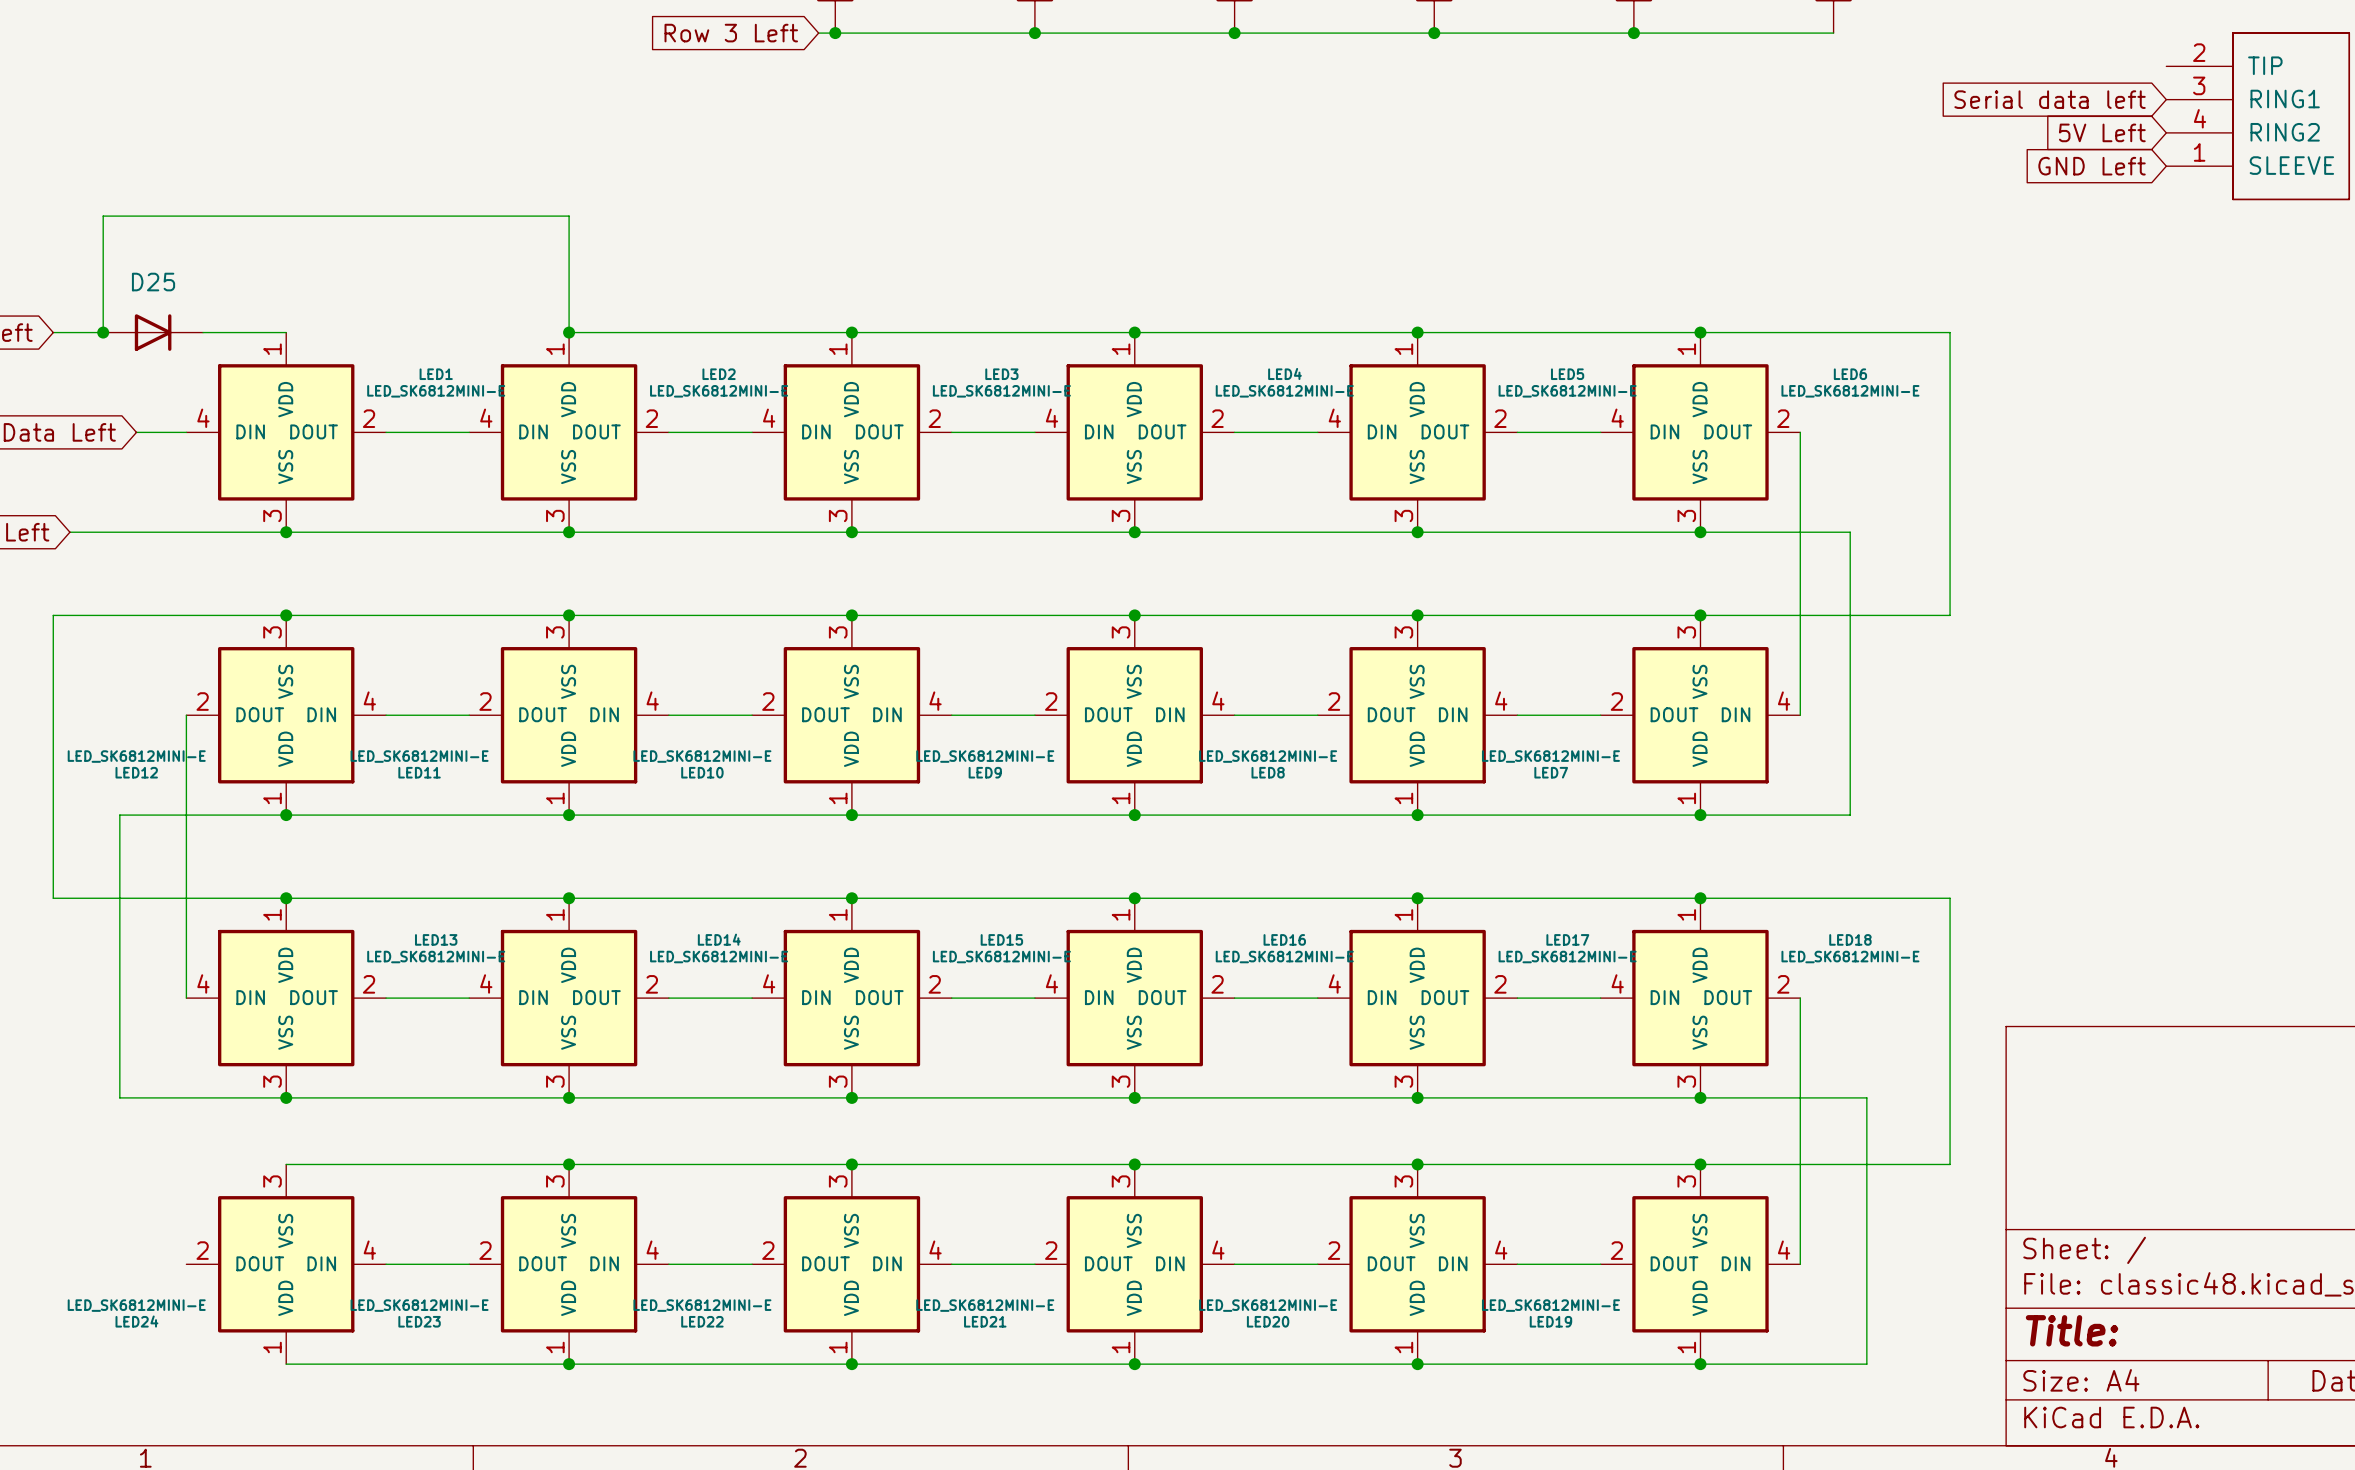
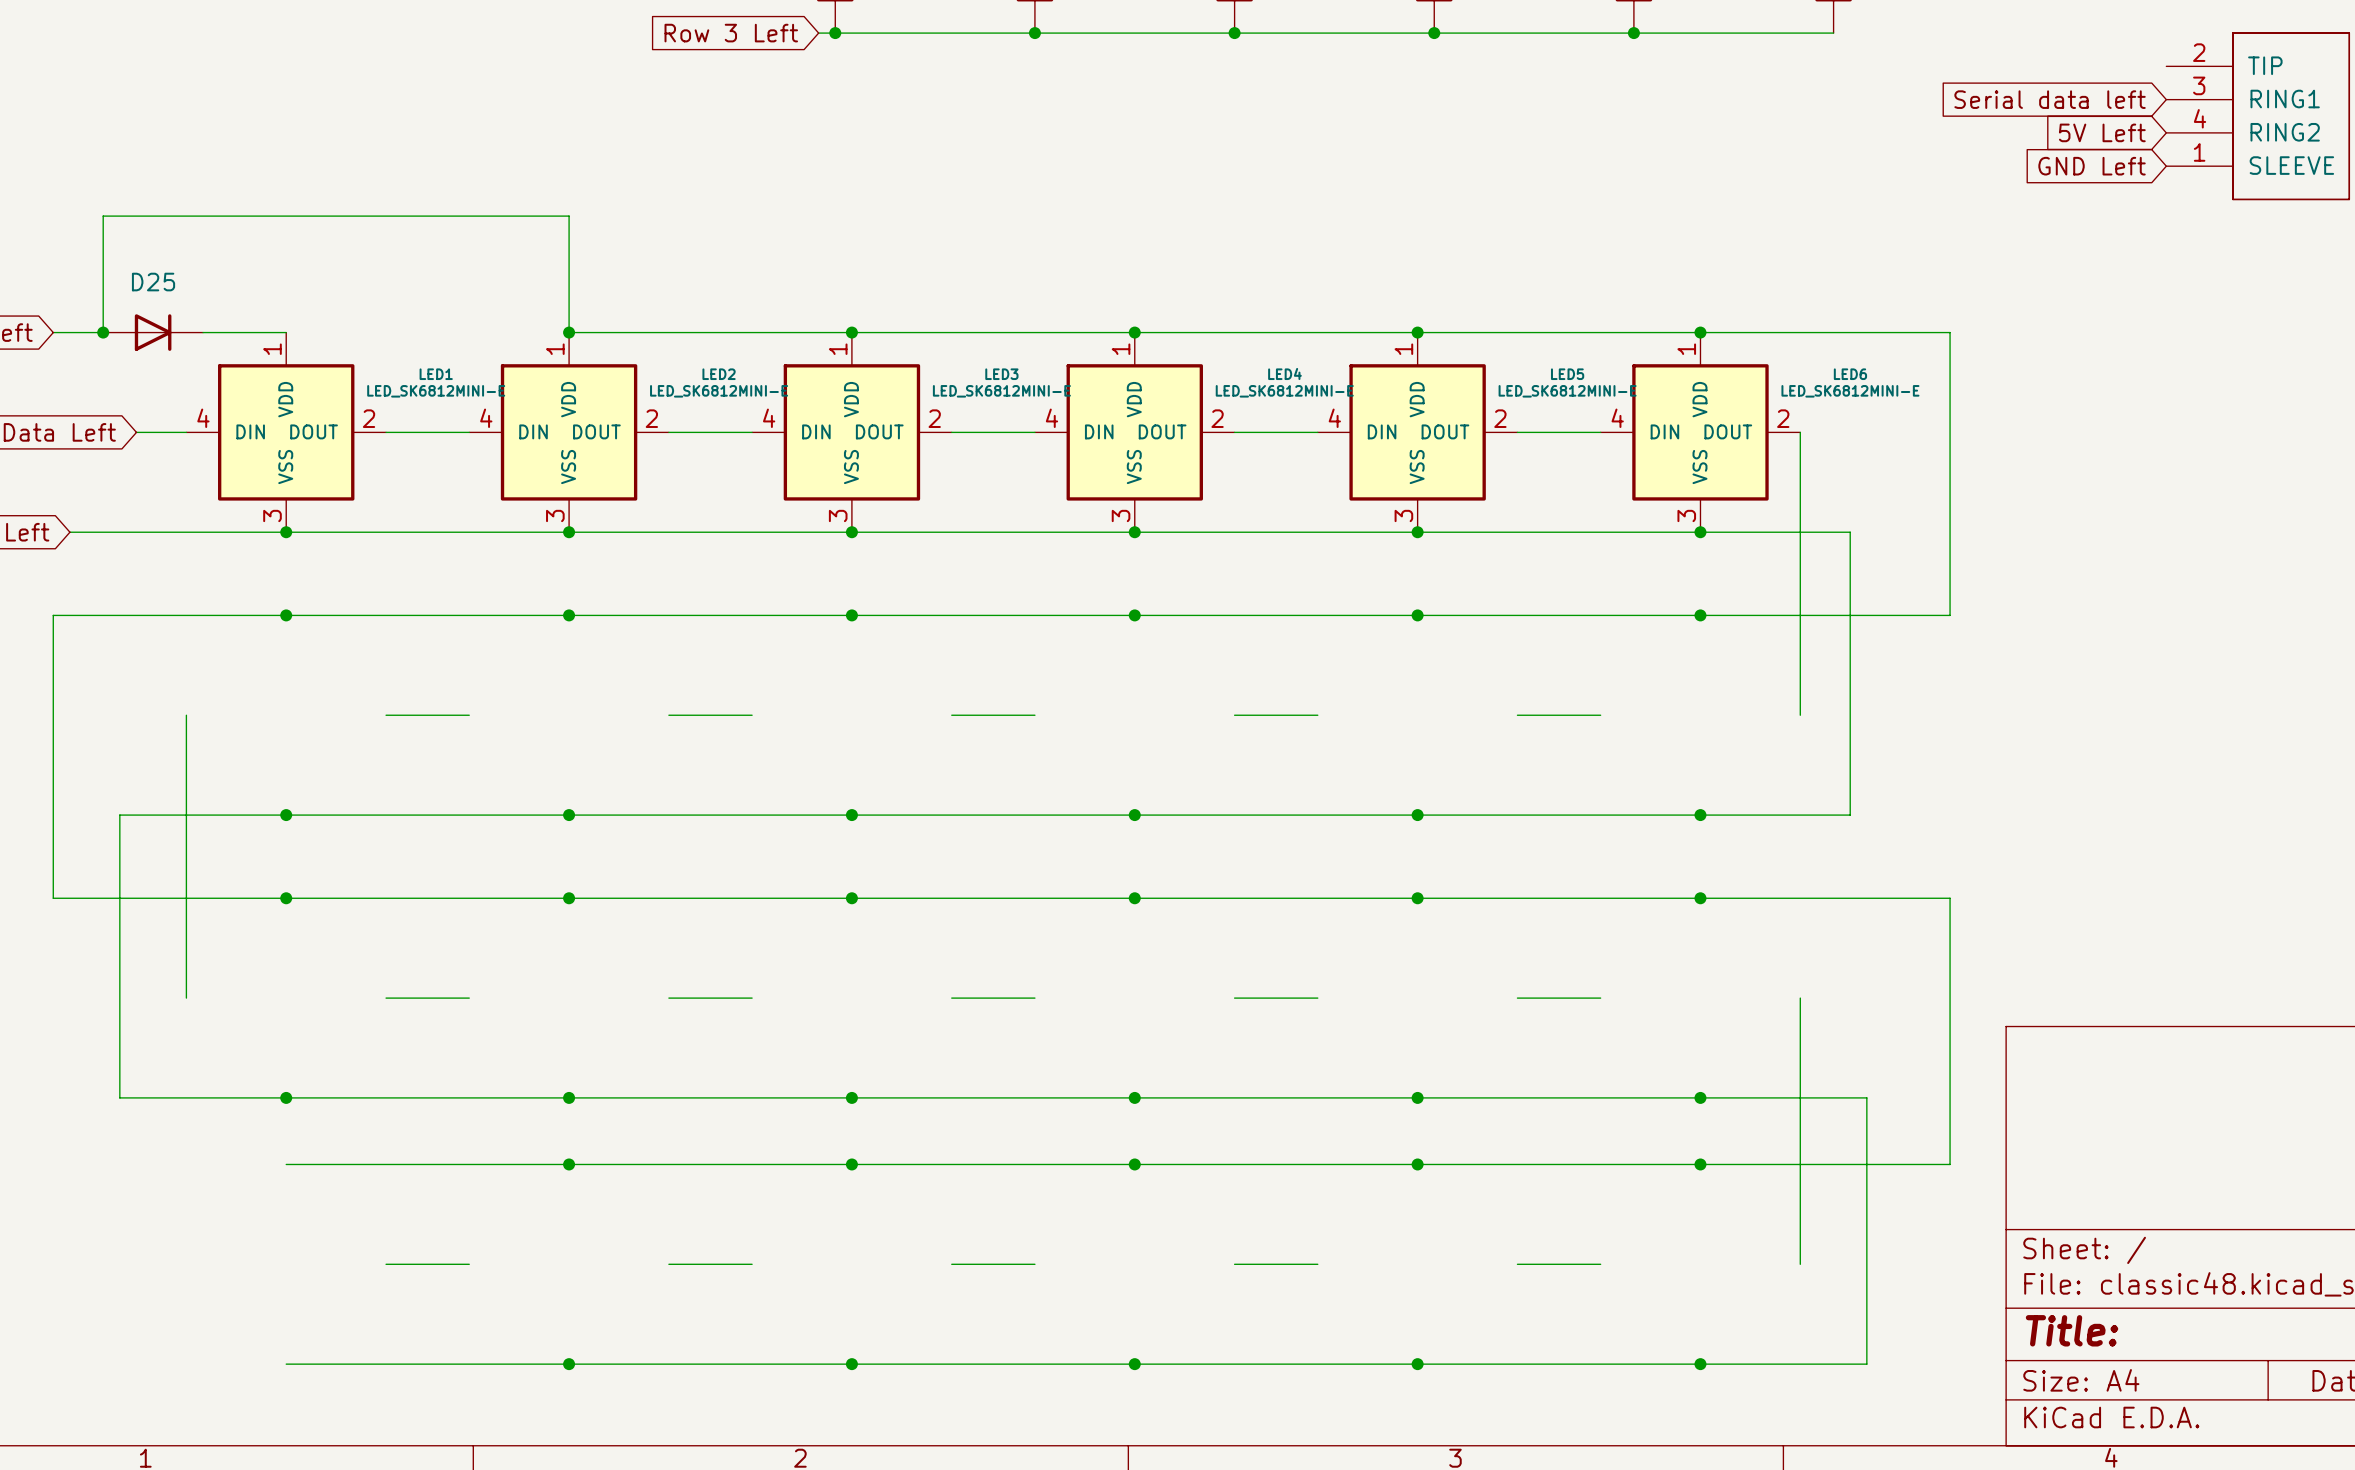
LED12: LED_SK6812MINI-E (286, 715) -> none
LED11: LED_SK6812MINI-E (569, 715) -> none
LED10: LED_SK6812MINI-E (851, 715) -> none
LED9: LED_SK6812MINI-E (1134, 715) -> none
LED8: LED_SK6812MINI-E (1417, 715) -> none
LED7: LED_SK6812MINI-E (1700, 715) -> none
LED13: LED_SK6812MINI-E (286, 998) -> none
LED14: LED_SK6812MINI-E (569, 998) -> none
LED15: LED_SK6812MINI-E (851, 998) -> none
LED16: LED_SK6812MINI-E (1134, 998) -> none
LED17: LED_SK6812MINI-E (1417, 998) -> none
LED18: LED_SK6812MINI-E (1700, 998) -> none
LED24: LED_SK6812MINI-E (286, 1264) -> none
LED23: LED_SK6812MINI-E (569, 1264) -> none
LED22: LED_SK6812MINI-E (851, 1264) -> none
LED21: LED_SK6812MINI-E (1134, 1264) -> none
LED20: LED_SK6812MINI-E (1417, 1264) -> none
LED19: LED_SK6812MINI-E (1700, 1264) -> none

